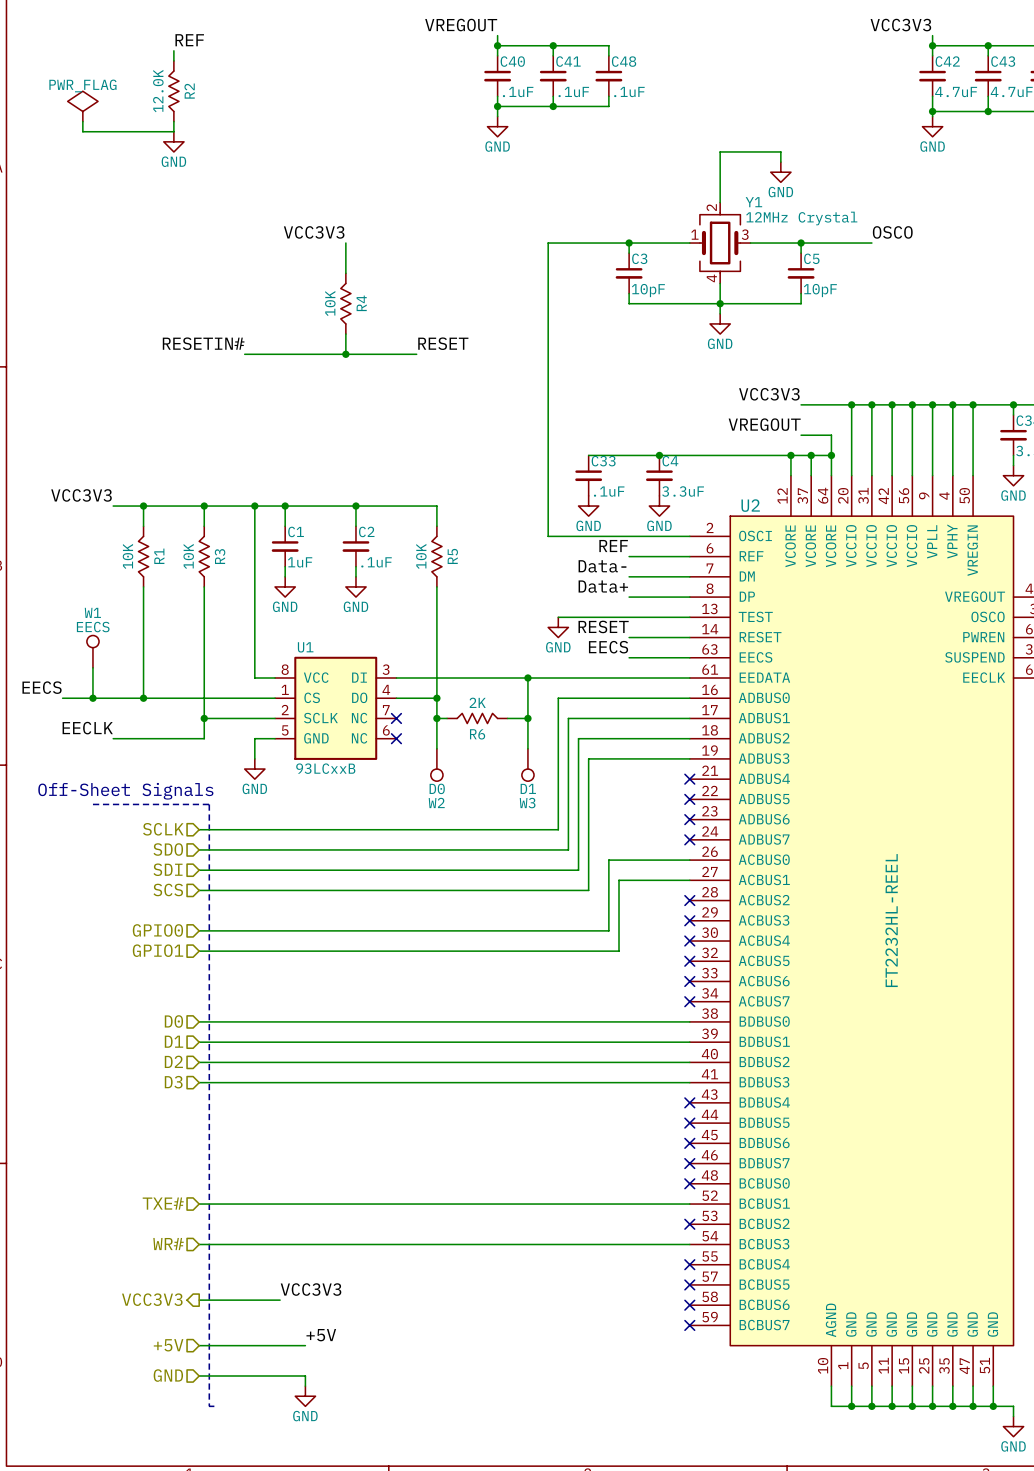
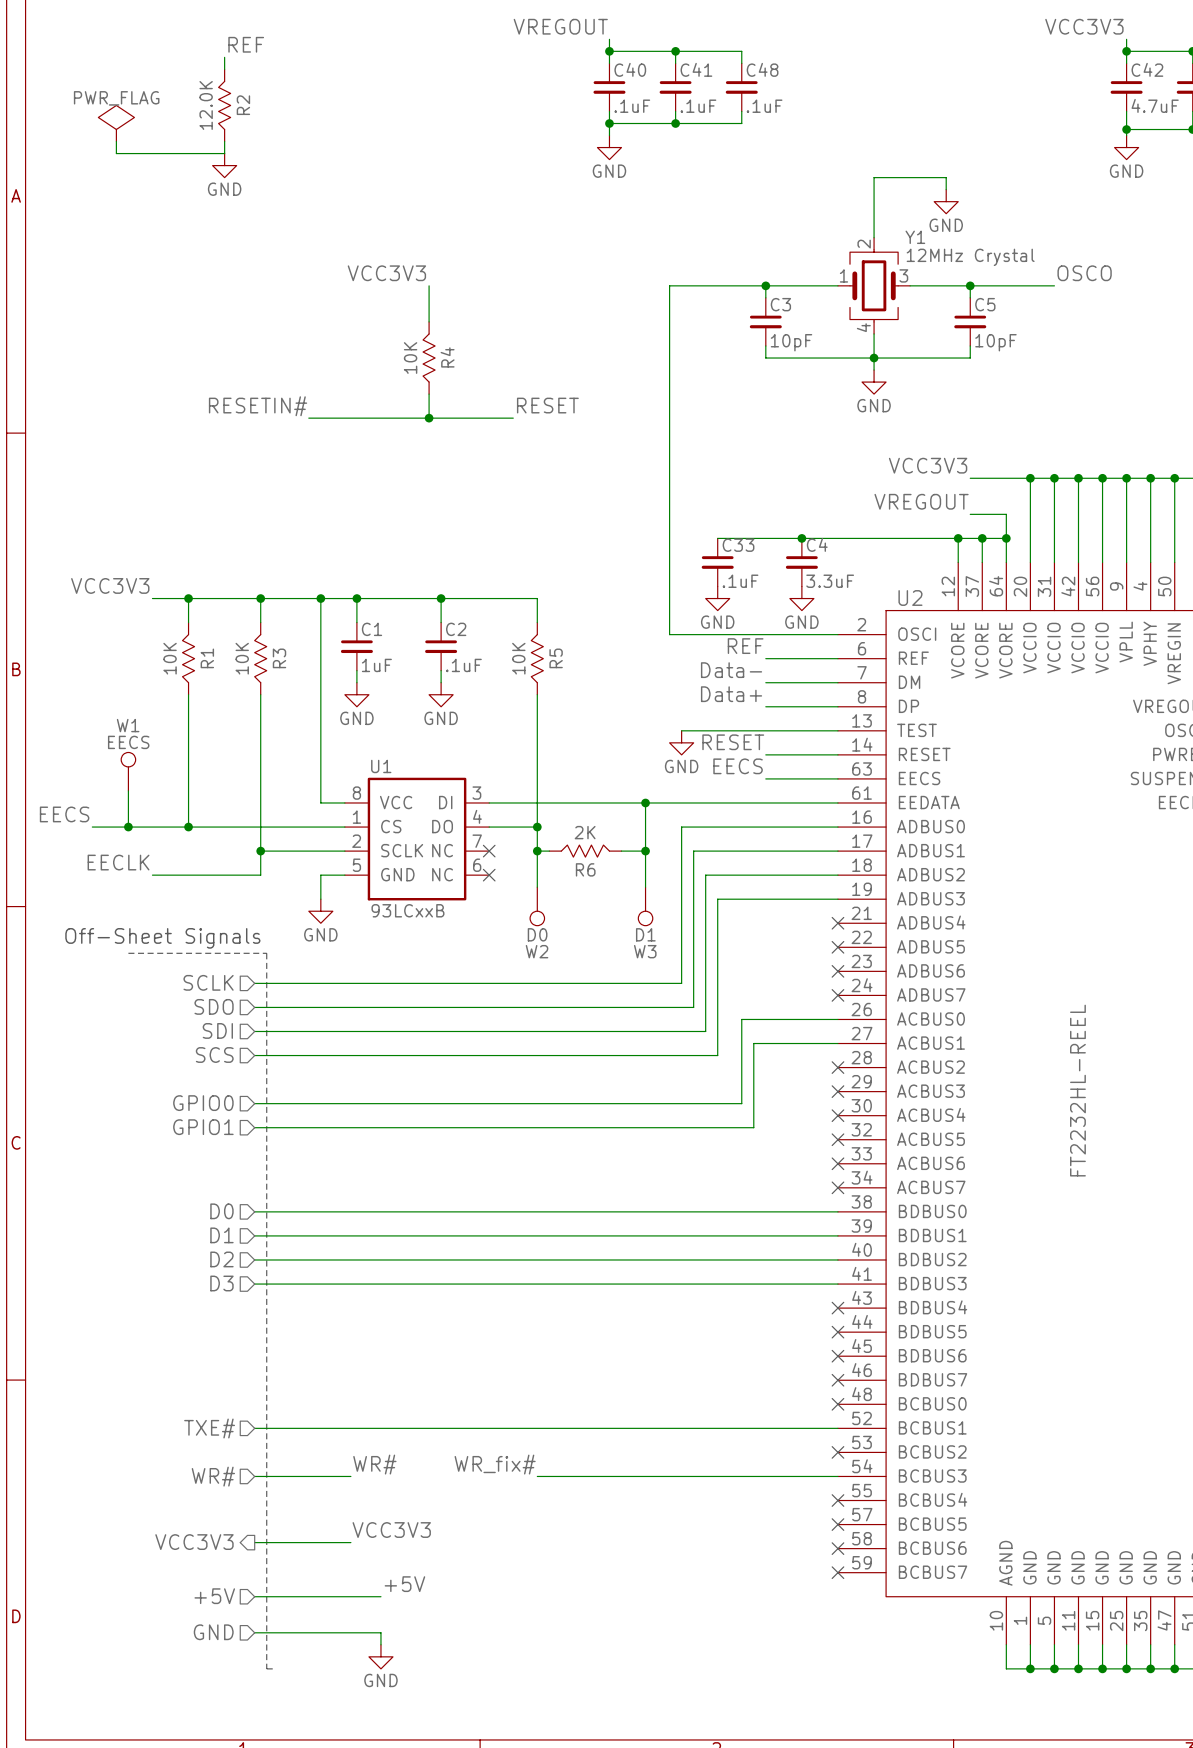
label: none -> WR# (374, 1464)
label: none -> WR_fix# (495, 1464)
wire: (280, 1244) (436, 1244) -> none

